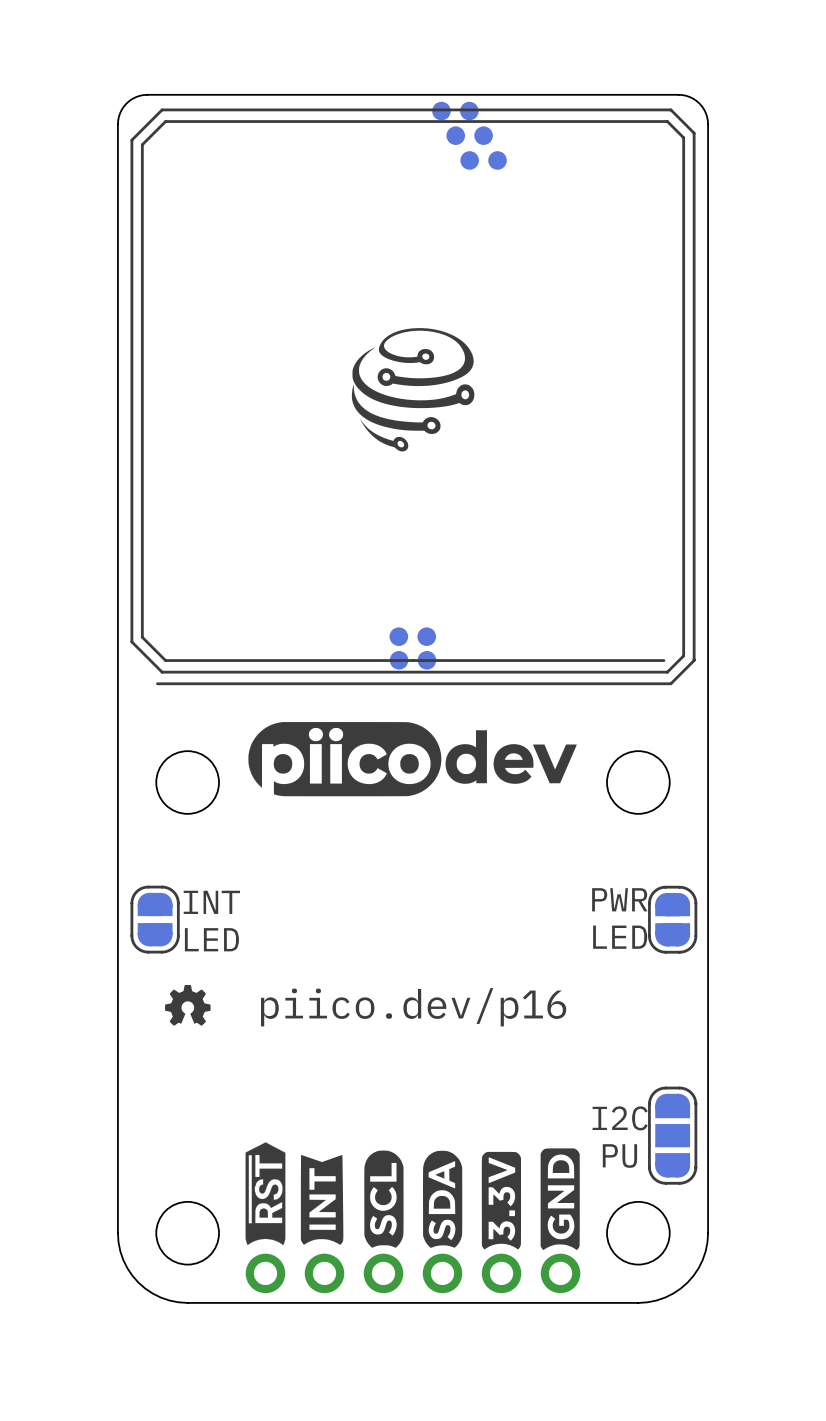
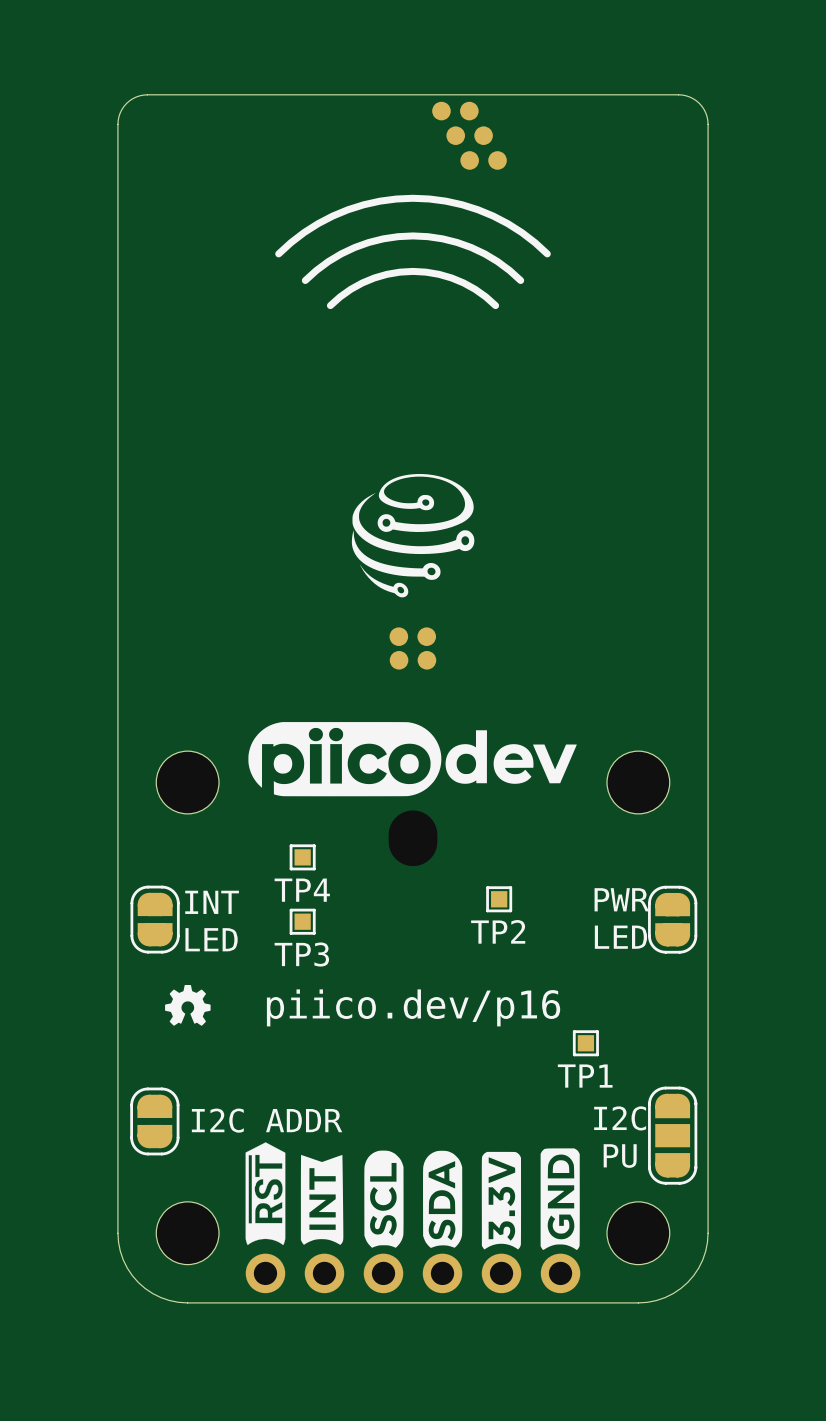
line: none -> (547, 253) (521, 232) (493, 216) (462, 204) (413, 198) (363, 204) (332, 216) (304, 232) (278, 253)
line: none -> (520, 280) (497, 261) (471, 247) (442, 238) (413, 235) (383, 238) (354, 247) (328, 261) (305, 280)
line: none -> (495, 305) (463, 282) (439, 274) (413, 271) (387, 274) (362, 282) (330, 305)
drawing position: (413, 389) -> (413, 535)
line: (663, 660) (165, 660) (142, 637) (142, 144) (165, 121) (667, 121) (683, 137) (683, 655) (667, 672) (162, 672) (131, 641) (131, 140) (162, 109) (670, 109) (694, 133) (694, 660) (670, 683) (157, 683) -> none
TP4: none -> (302, 857)
TP2: none -> (499, 899)
TP3: none -> (302, 921)
TP1: none -> (585, 1043)
part: none -> (154, 1121)

